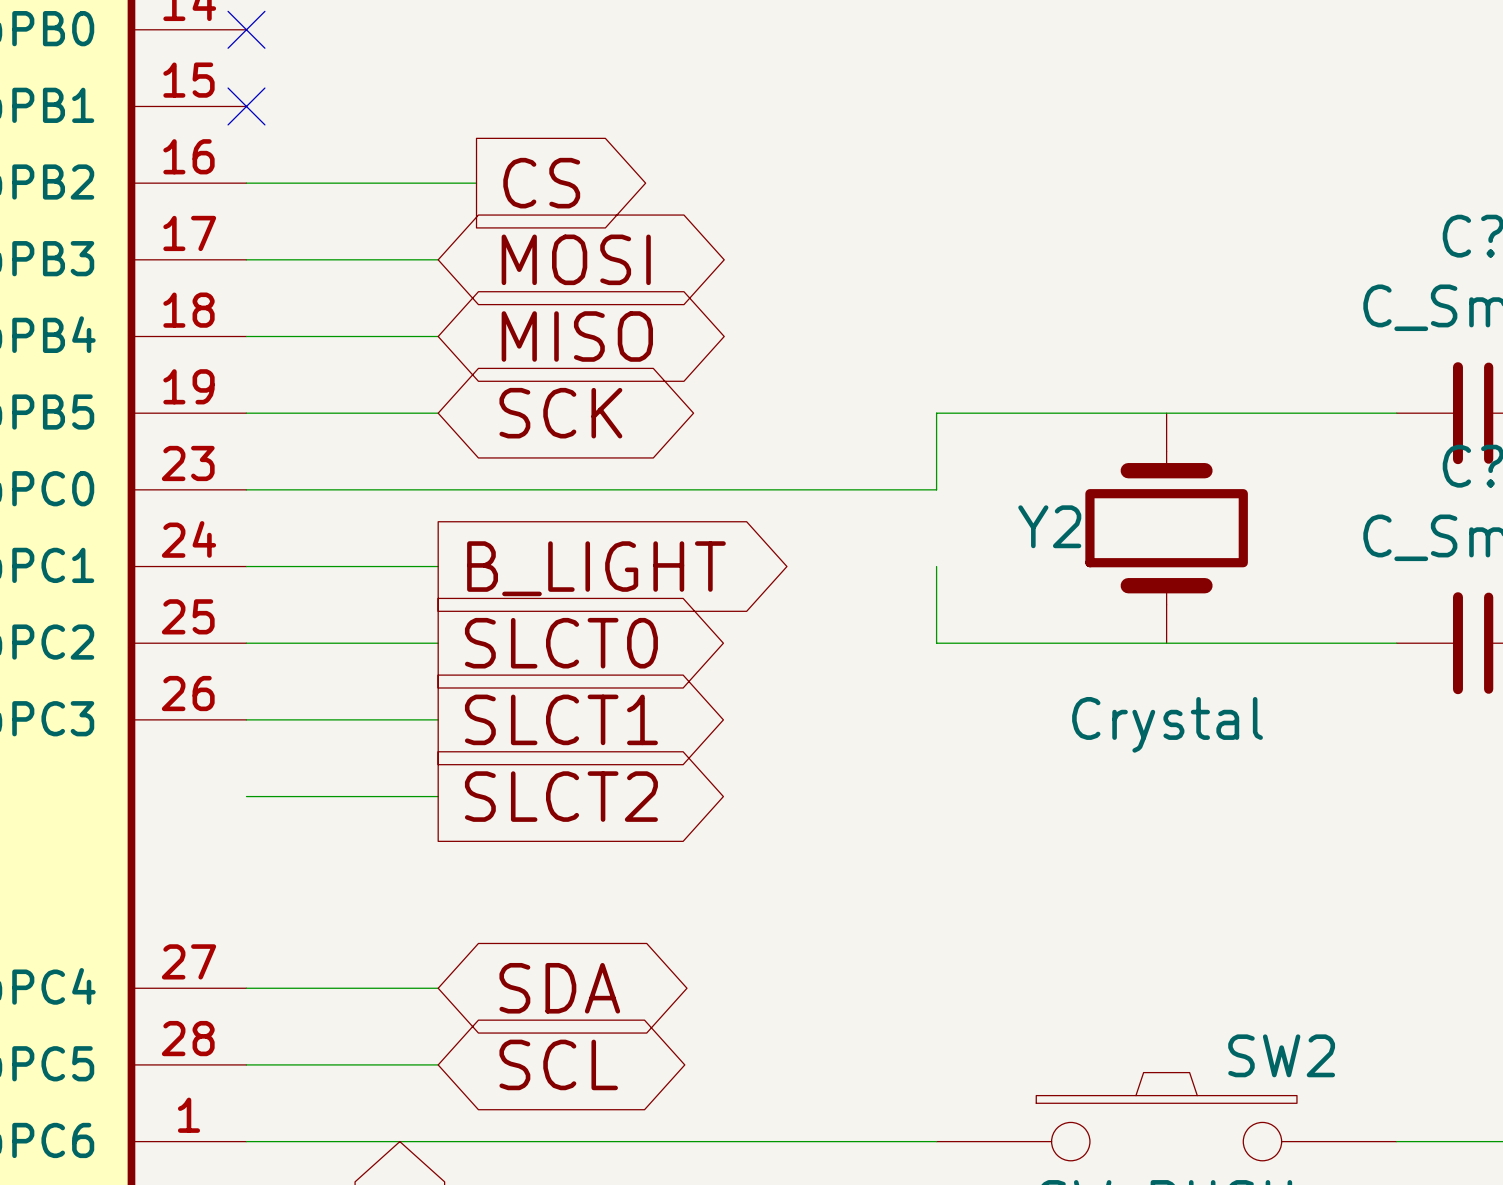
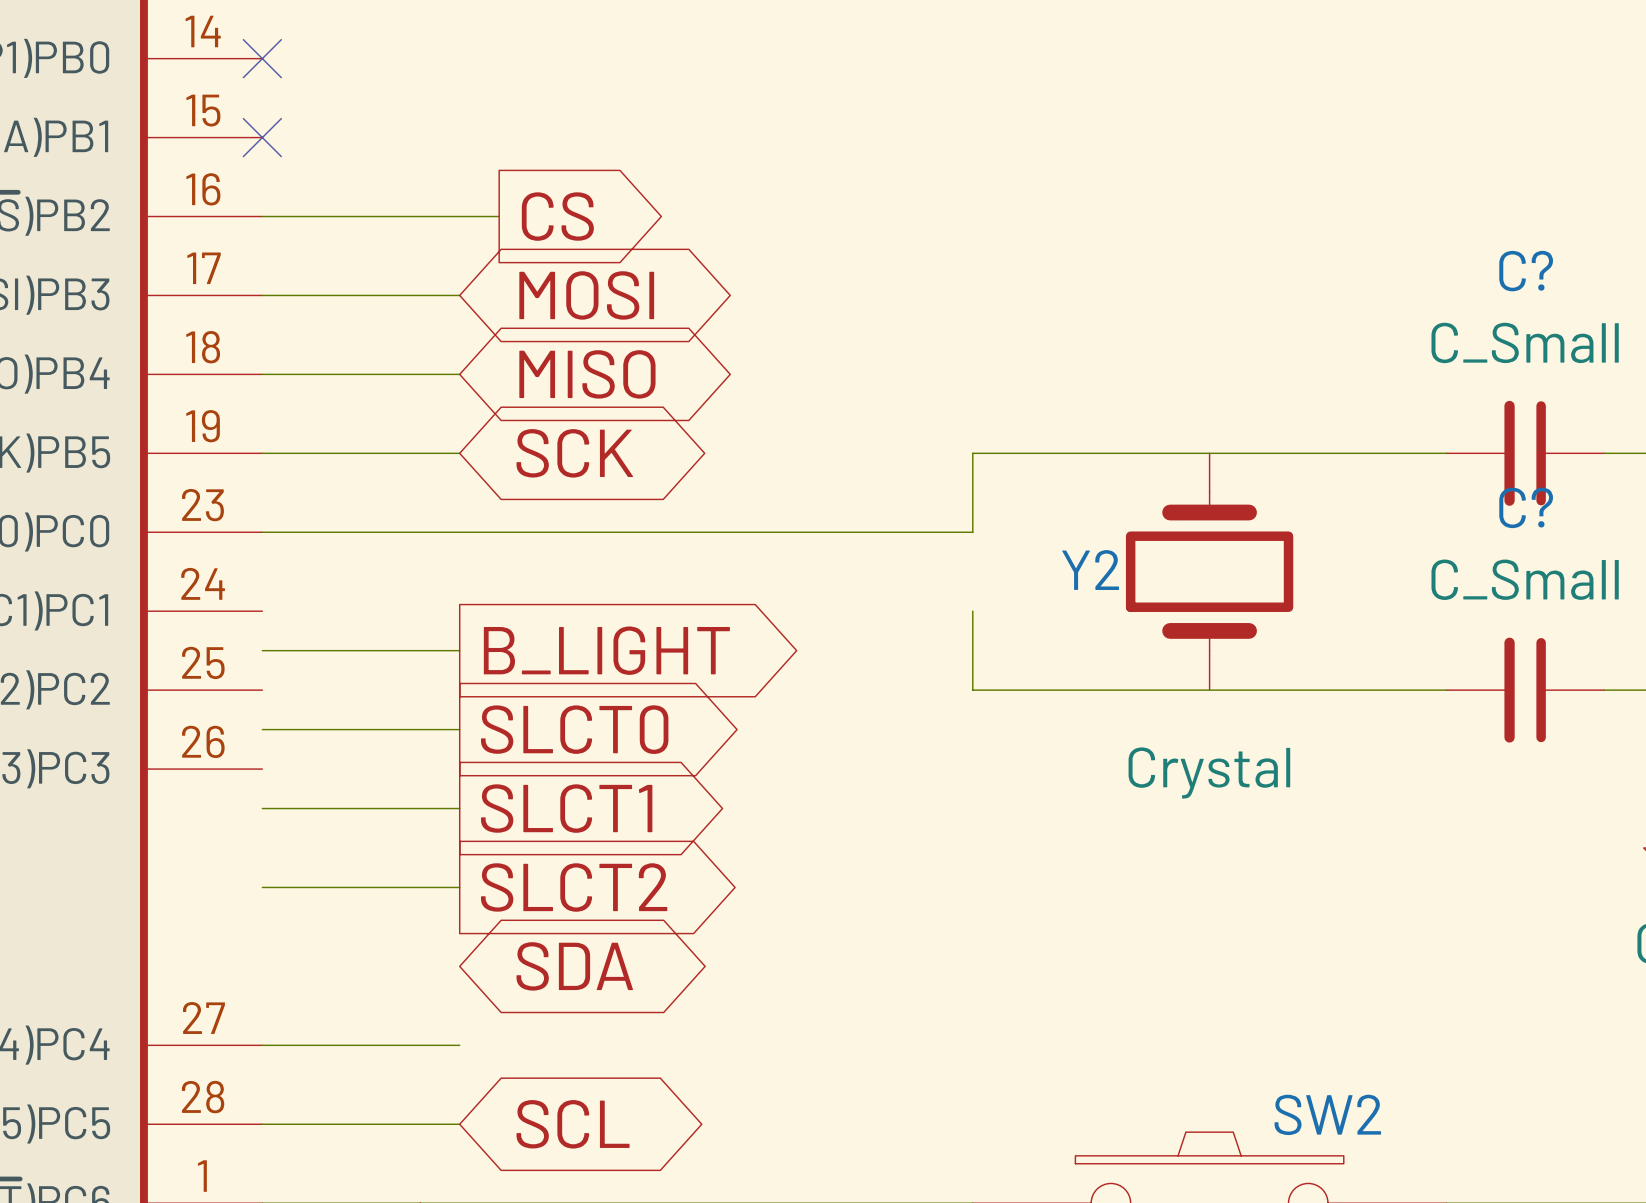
wire: (246, 566) (438, 566) -> (262, 650) (459, 650)
global label position: B_LIGHT (596, 568) -> B_LIGHT (606, 650)
wire: (246, 643) (438, 643) -> (262, 729) (459, 729)
global label position: SLCT0 (561, 643) -> SLCT0 (574, 729)
wire: (246, 719) (438, 719) -> (262, 808) (459, 808)
global label position: SLCT1 (561, 719) -> SLCT1 (566, 808)
wire: (246, 796) (438, 796) -> (262, 887) (459, 887)
global label position: SLCT2 (561, 796) -> SLCT2 (574, 887)
global label position: SDA (559, 988) -> SDA (574, 966)

